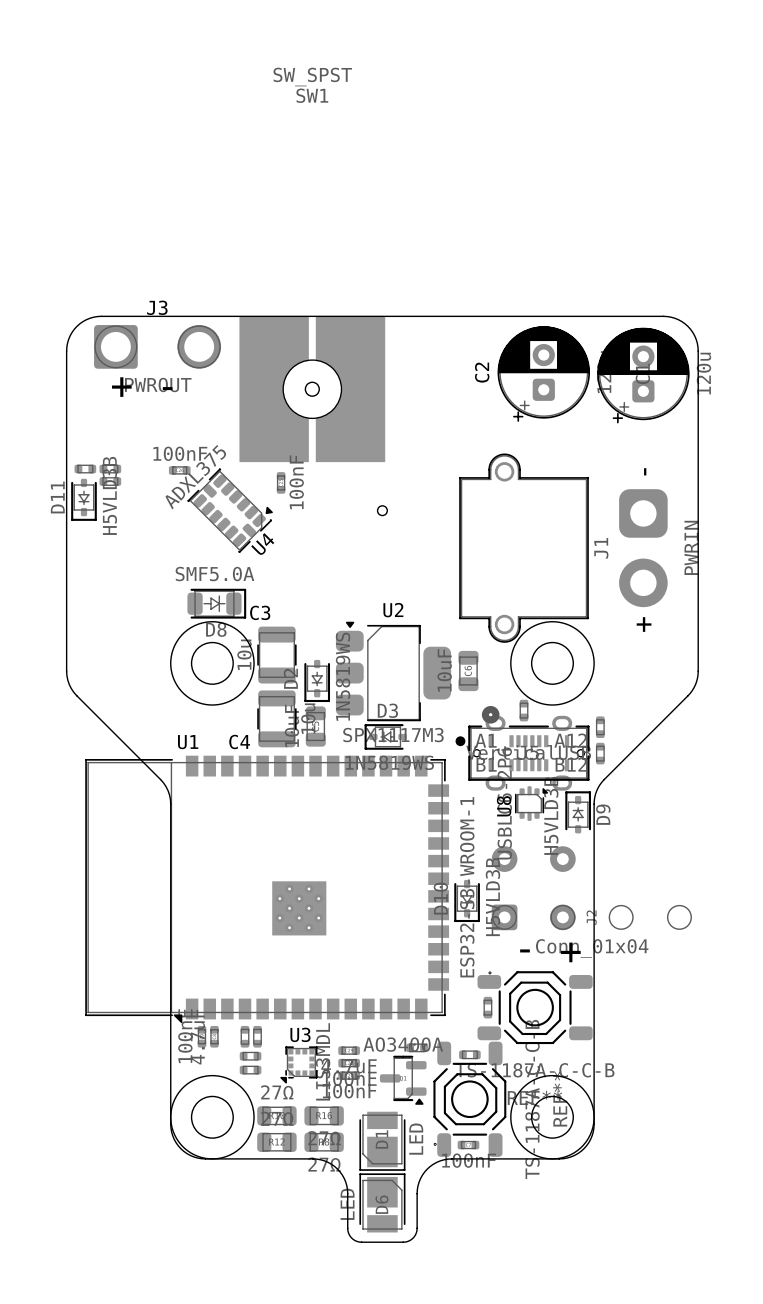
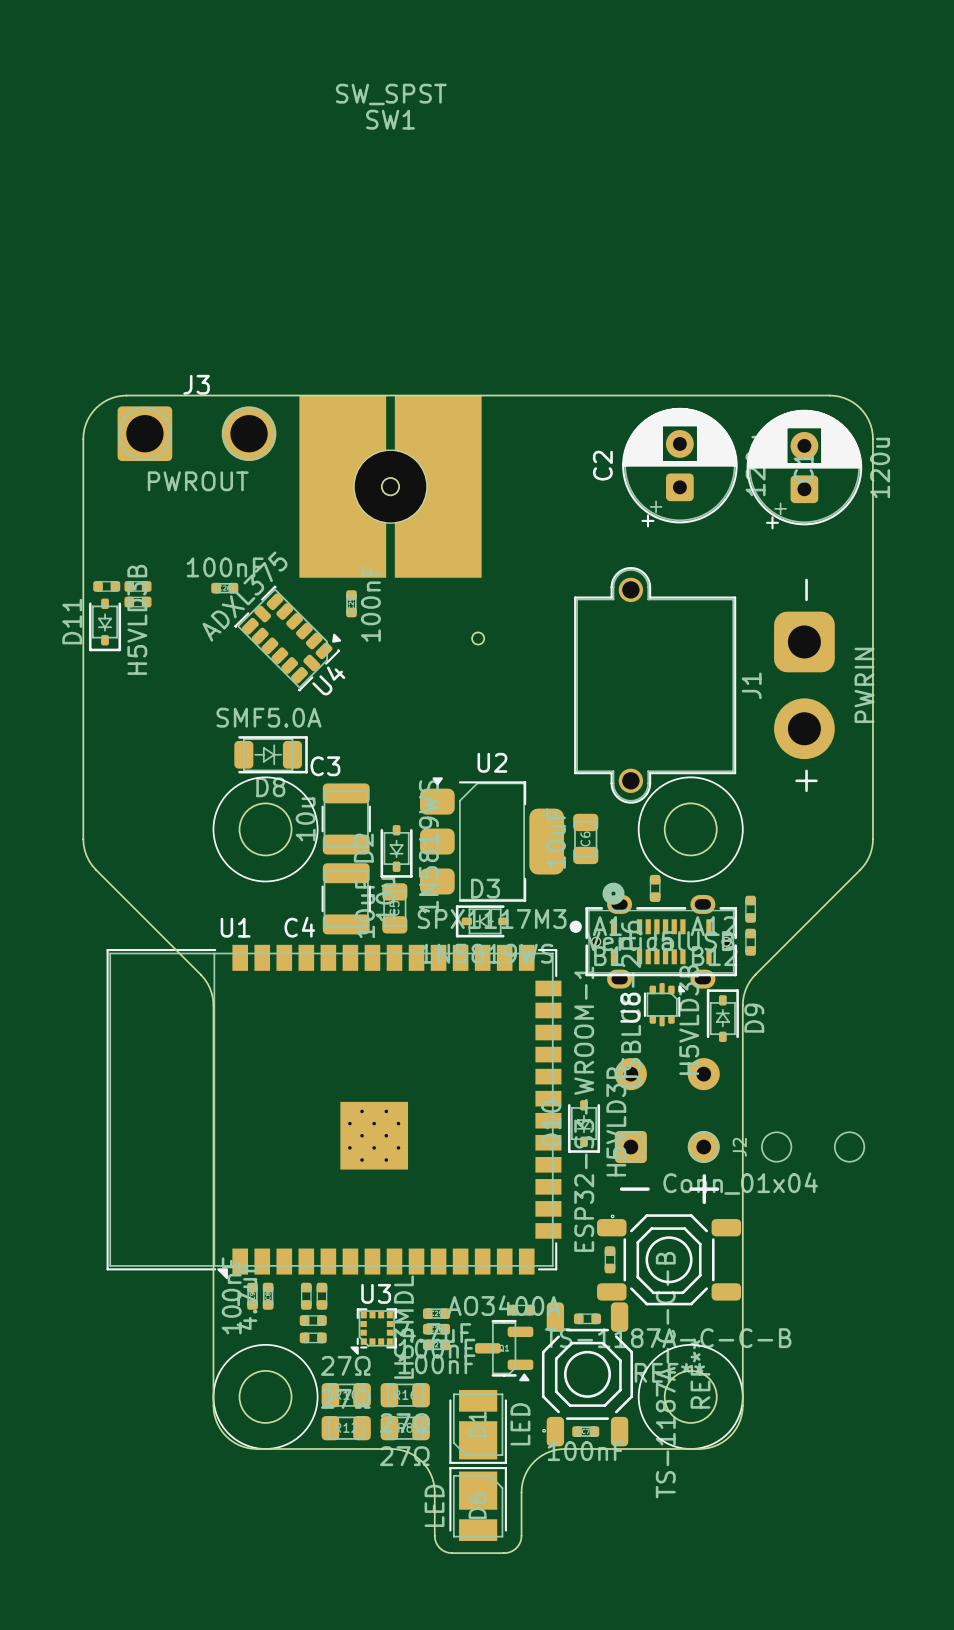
text: + - (142, 387) -> none

